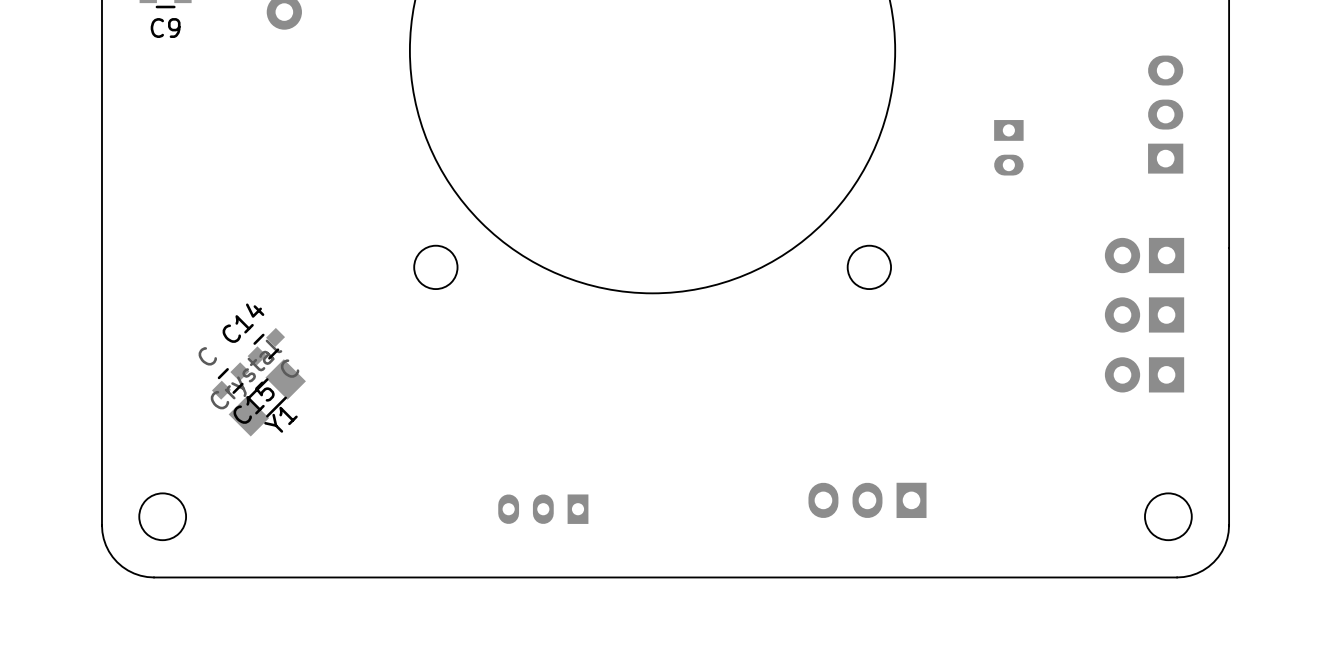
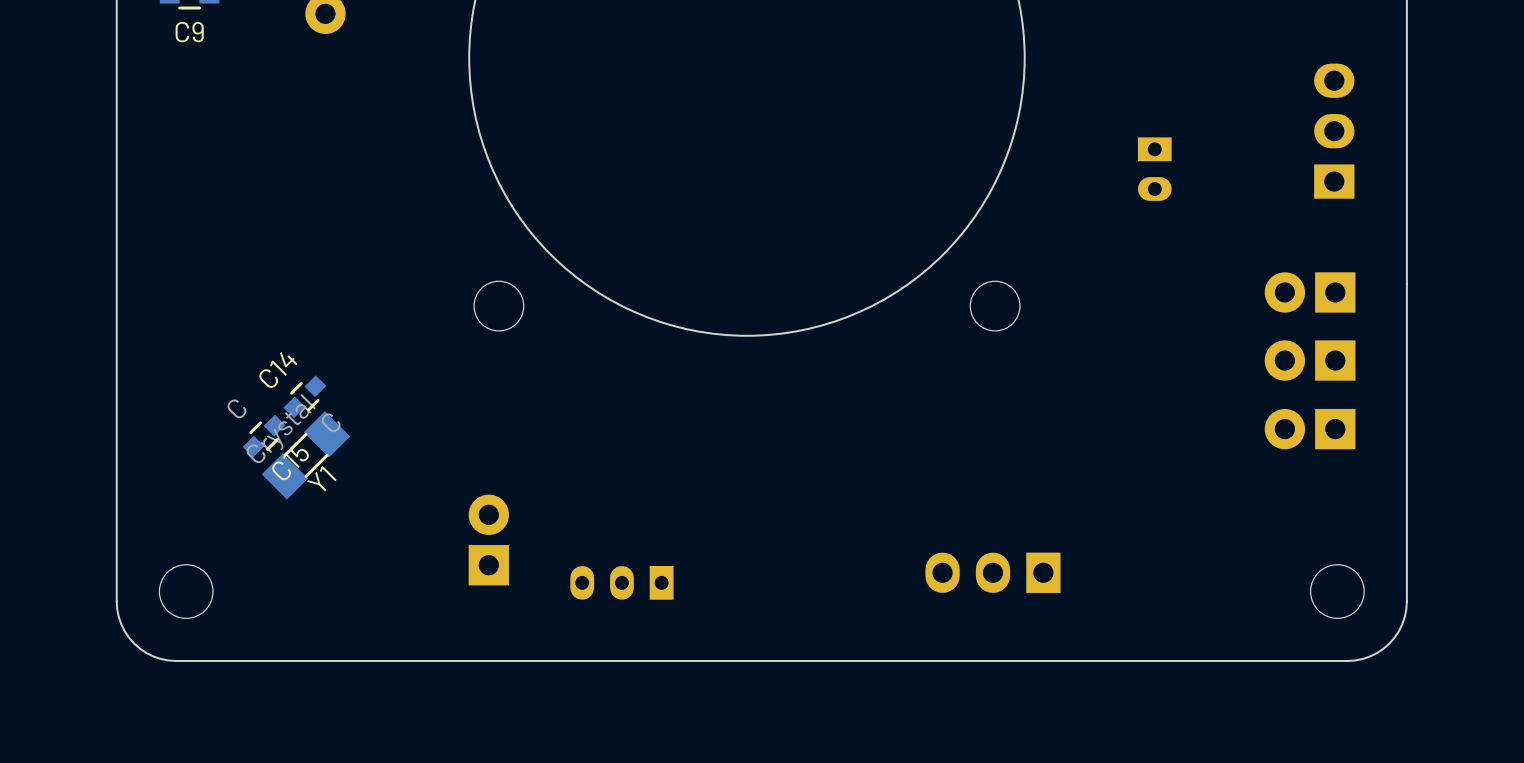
part: none -> (488, 540)

